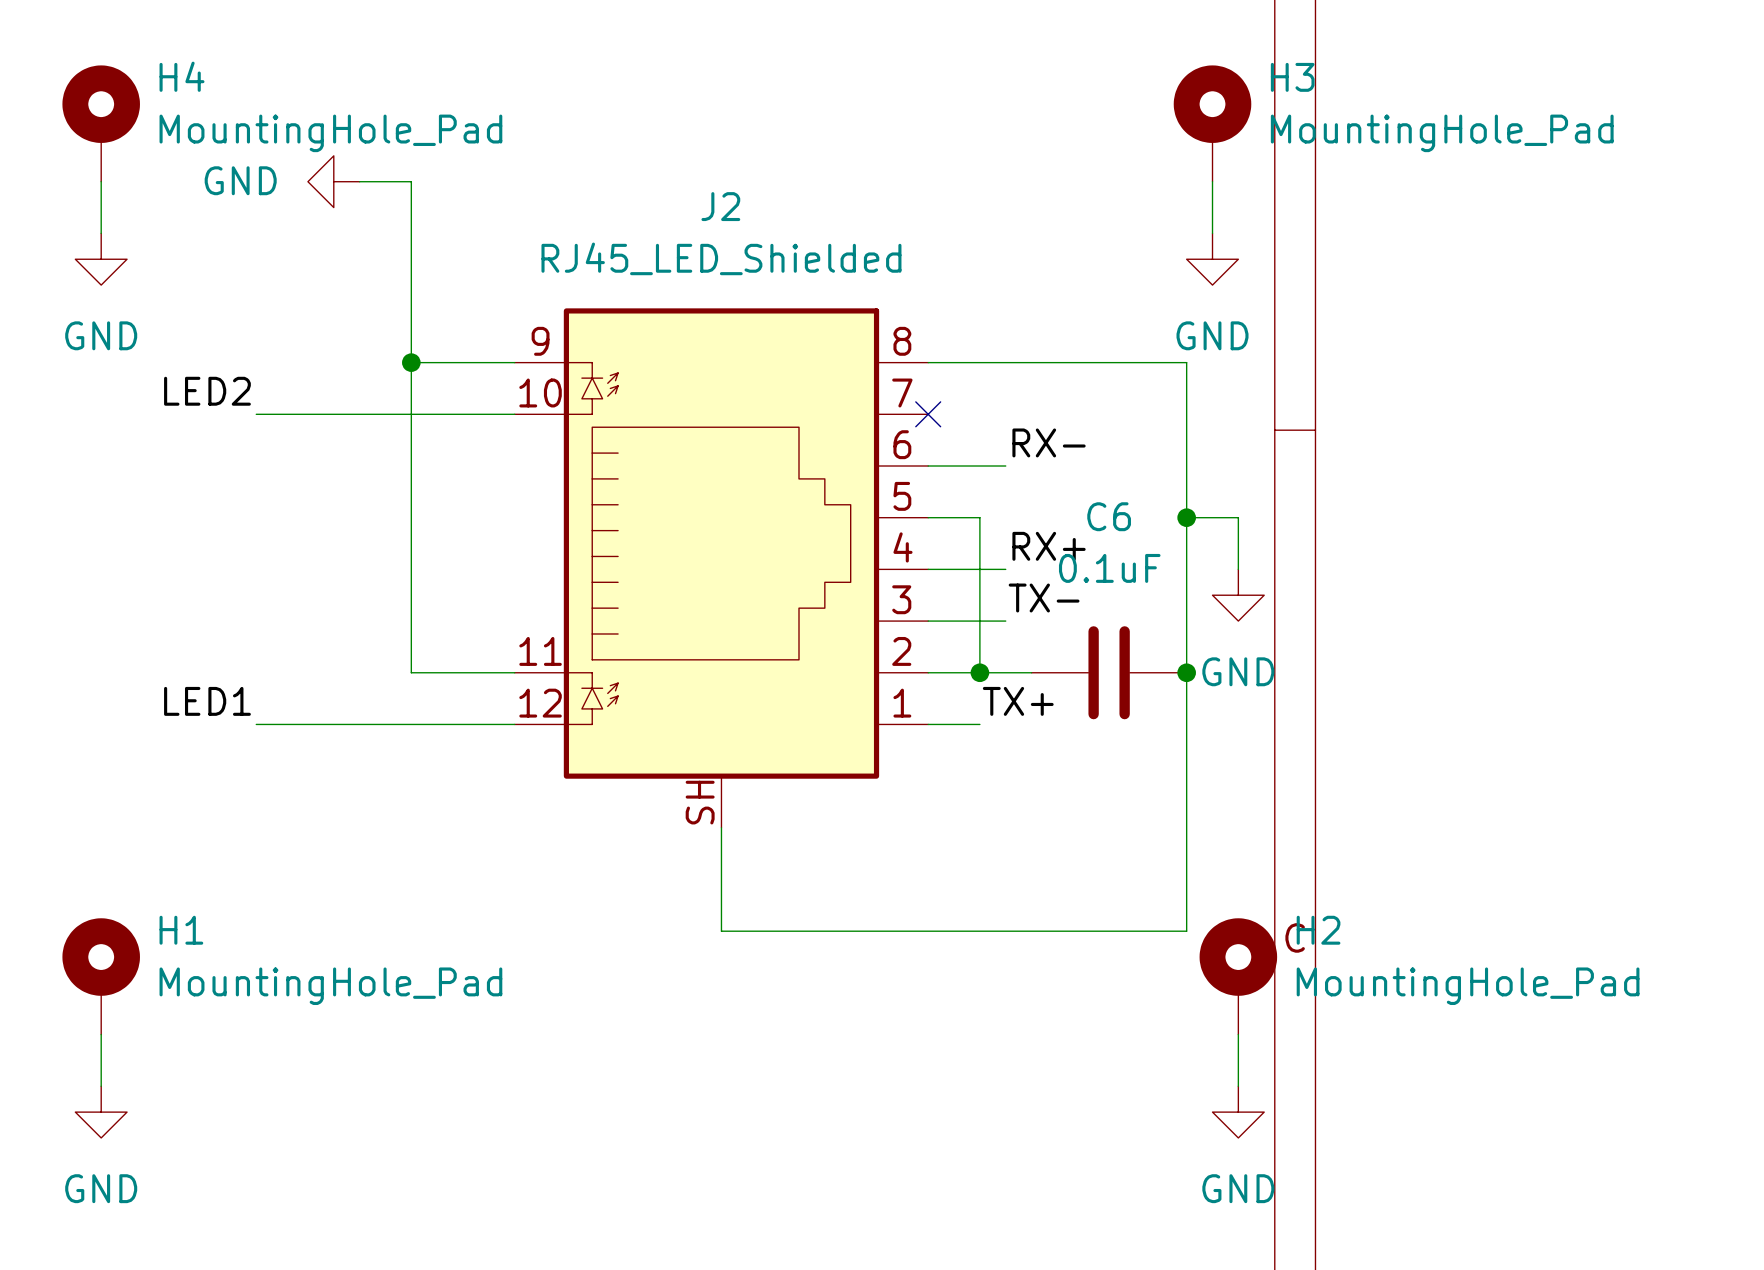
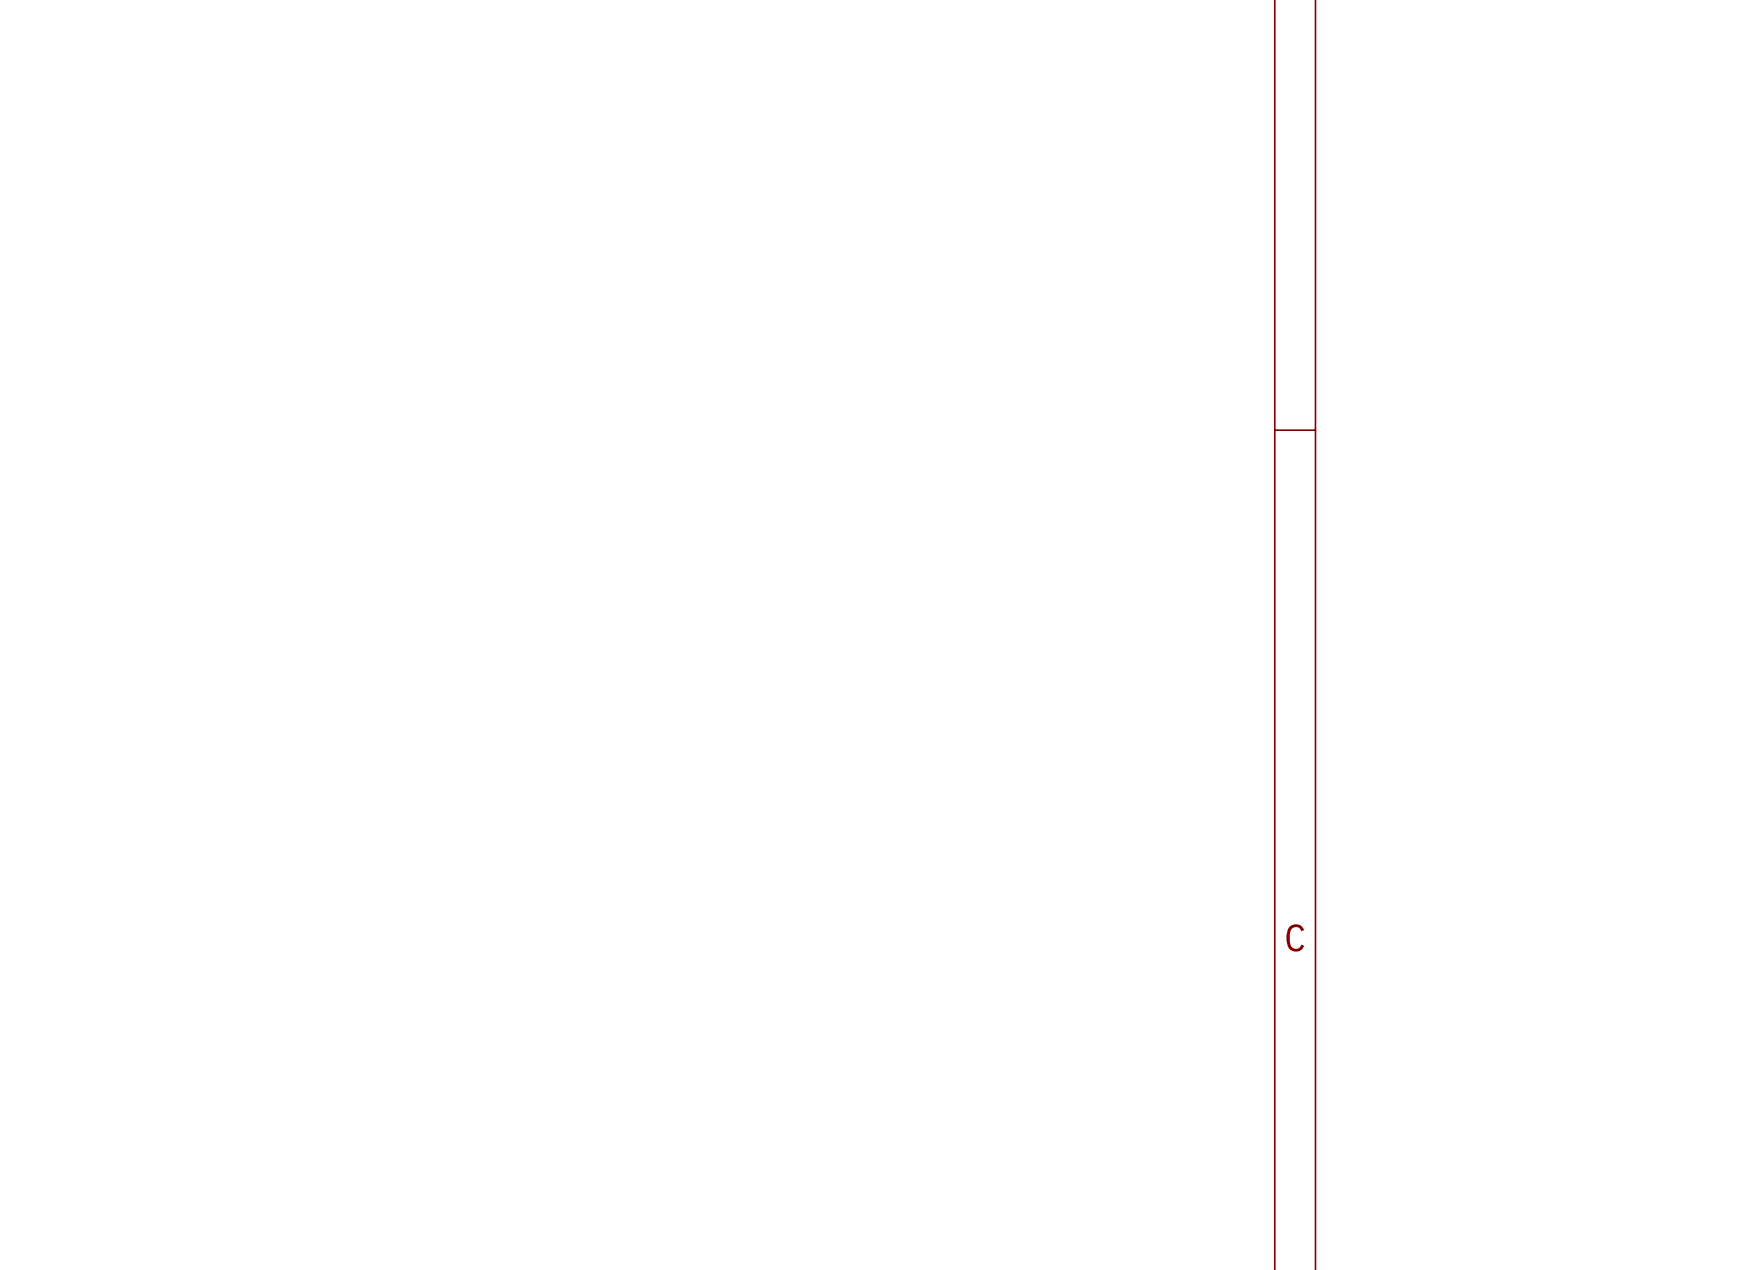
H4: MountingHole_Pad (101, 123) -> none
H3: MountingHole_Pad (1212, 123) -> none
wire: (101, 181) (101, 233) -> none
power symbol: GND (333, 181) -> none
wire: (359, 181) (411, 181) (411, 672) (514, 672) -> none
wire: (1212, 181) (1212, 233) -> none
power symbol: GND (101, 259) -> none
power symbol: GND (1212, 259) -> none
wire: (411, 362) (514, 362) -> none
junction: (411, 362) -> none
wire: (928, 362) (1186, 362) (1186, 931) (721, 931) (721, 827) -> none
label: LED2 (207, 391) -> none
wire: (256, 414) (514, 414) -> none
no-connect mark: (928, 414) -> none
label: RX- (1049, 442) -> none
wire: (928, 466) (1005, 466) -> none
wire: (928, 517) (979, 517) (979, 672) -> none
wire: (1186, 517) (1238, 517) (1238, 569) -> none
junction: (1186, 517) -> none
label: RX+ (1049, 546) -> none
J2: RJ45_LED_Shielded (721, 568) -> none
wire: (928, 569) (1005, 569) -> none
power symbol: GND (1238, 595) -> none
label: TX- (1044, 598) -> none
wire: (928, 621) (1005, 621) -> none
wire: (928, 672) (1031, 672) -> none
junction: (979, 672) -> none
C6: 0.1uF (1109, 672) -> none
junction: (1186, 672) -> none
label: LED1 (207, 701) -> none
label: TX+ (1018, 701) -> none
wire: (256, 724) (514, 724) -> none
wire: (928, 724) (979, 724) -> none
H1: MountingHole_Pad (101, 976) -> none
H2: MountingHole_Pad (1238, 976) -> none
wire: (101, 1034) (101, 1086) -> none
wire: (1238, 1034) (1238, 1086) -> none
power symbol: GND (101, 1112) -> none
power symbol: GND (1238, 1112) -> none

